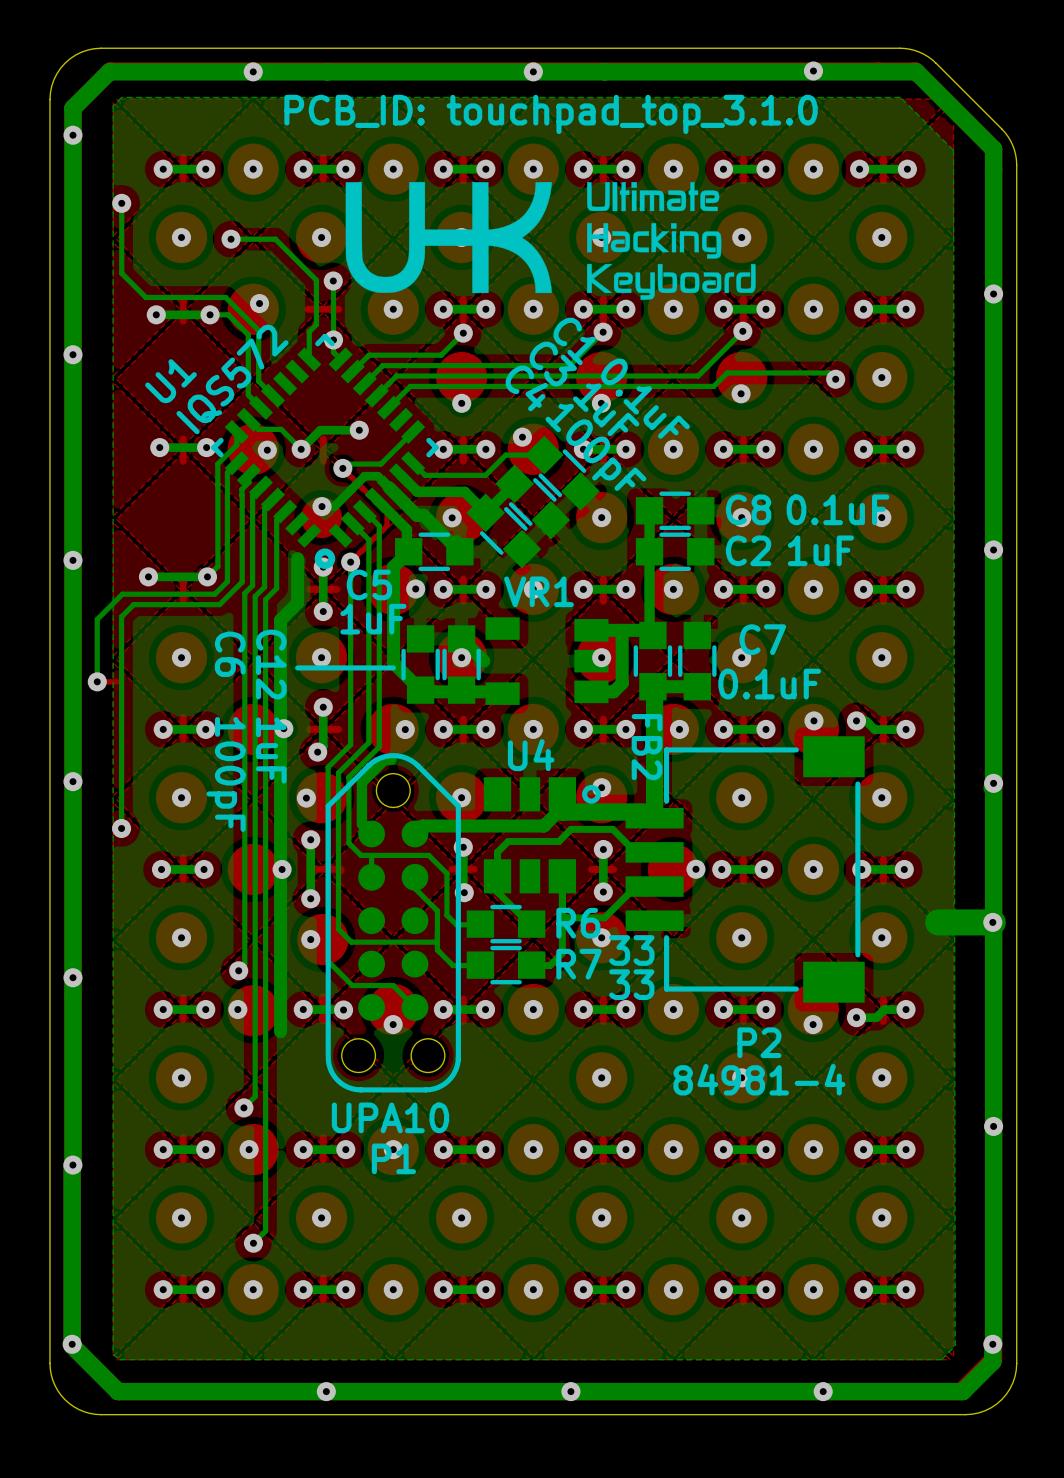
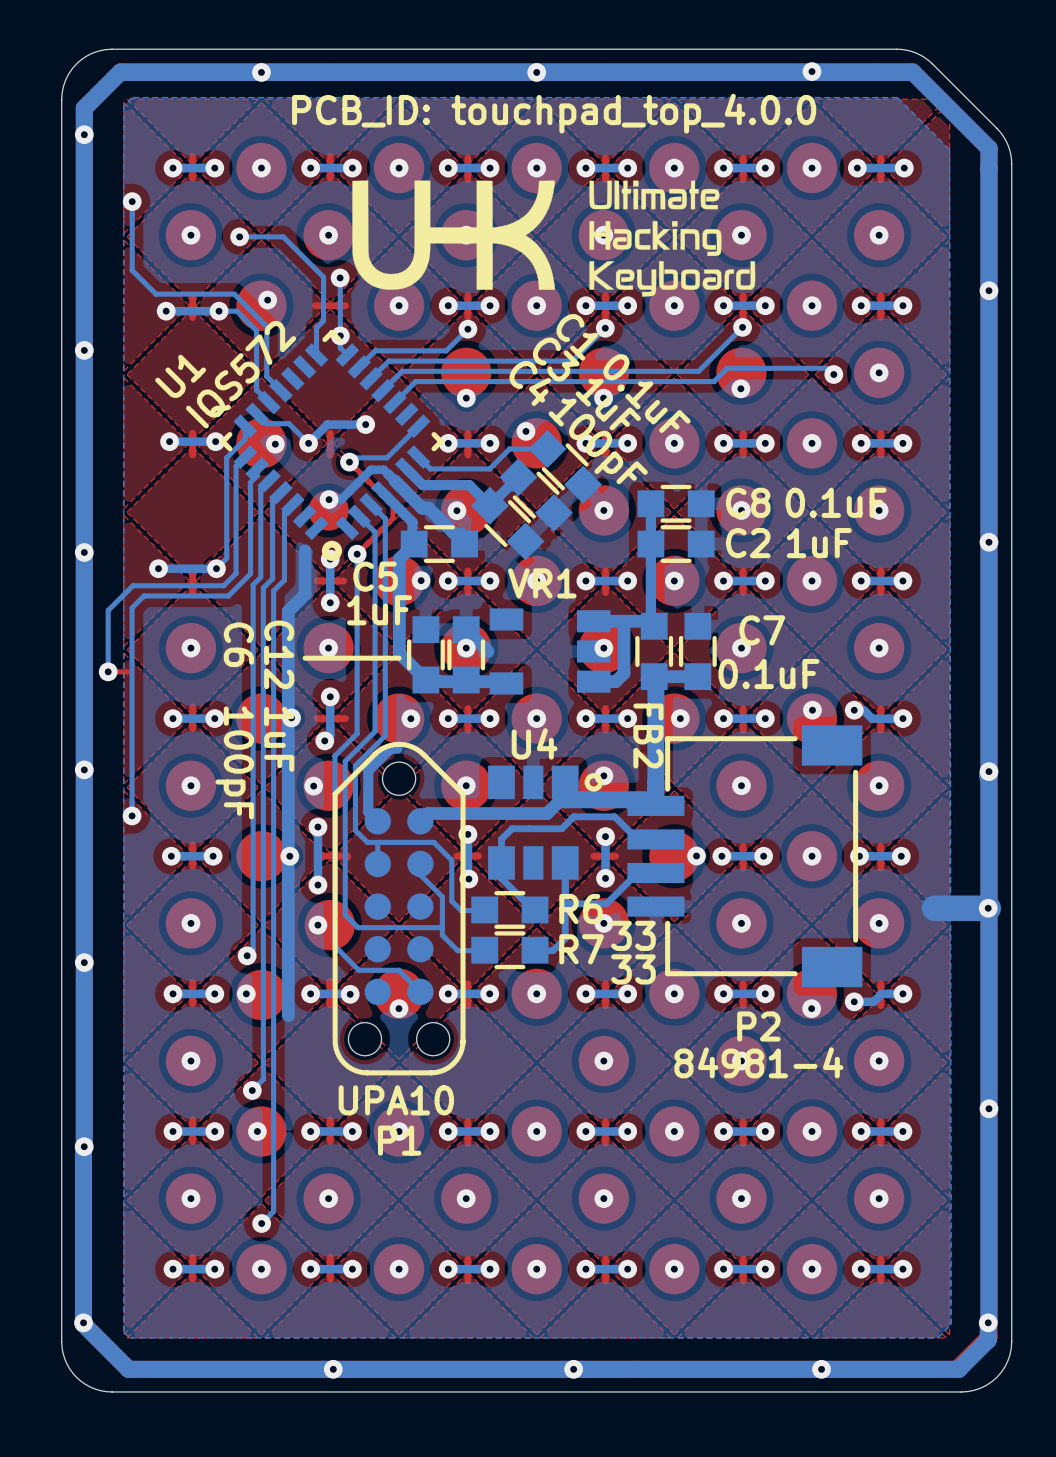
text: PCB_ID: touchpad_top_3.1.0 (551, 114) -> PCB_ID: touchpad_top_4.0.0 (554, 113)

